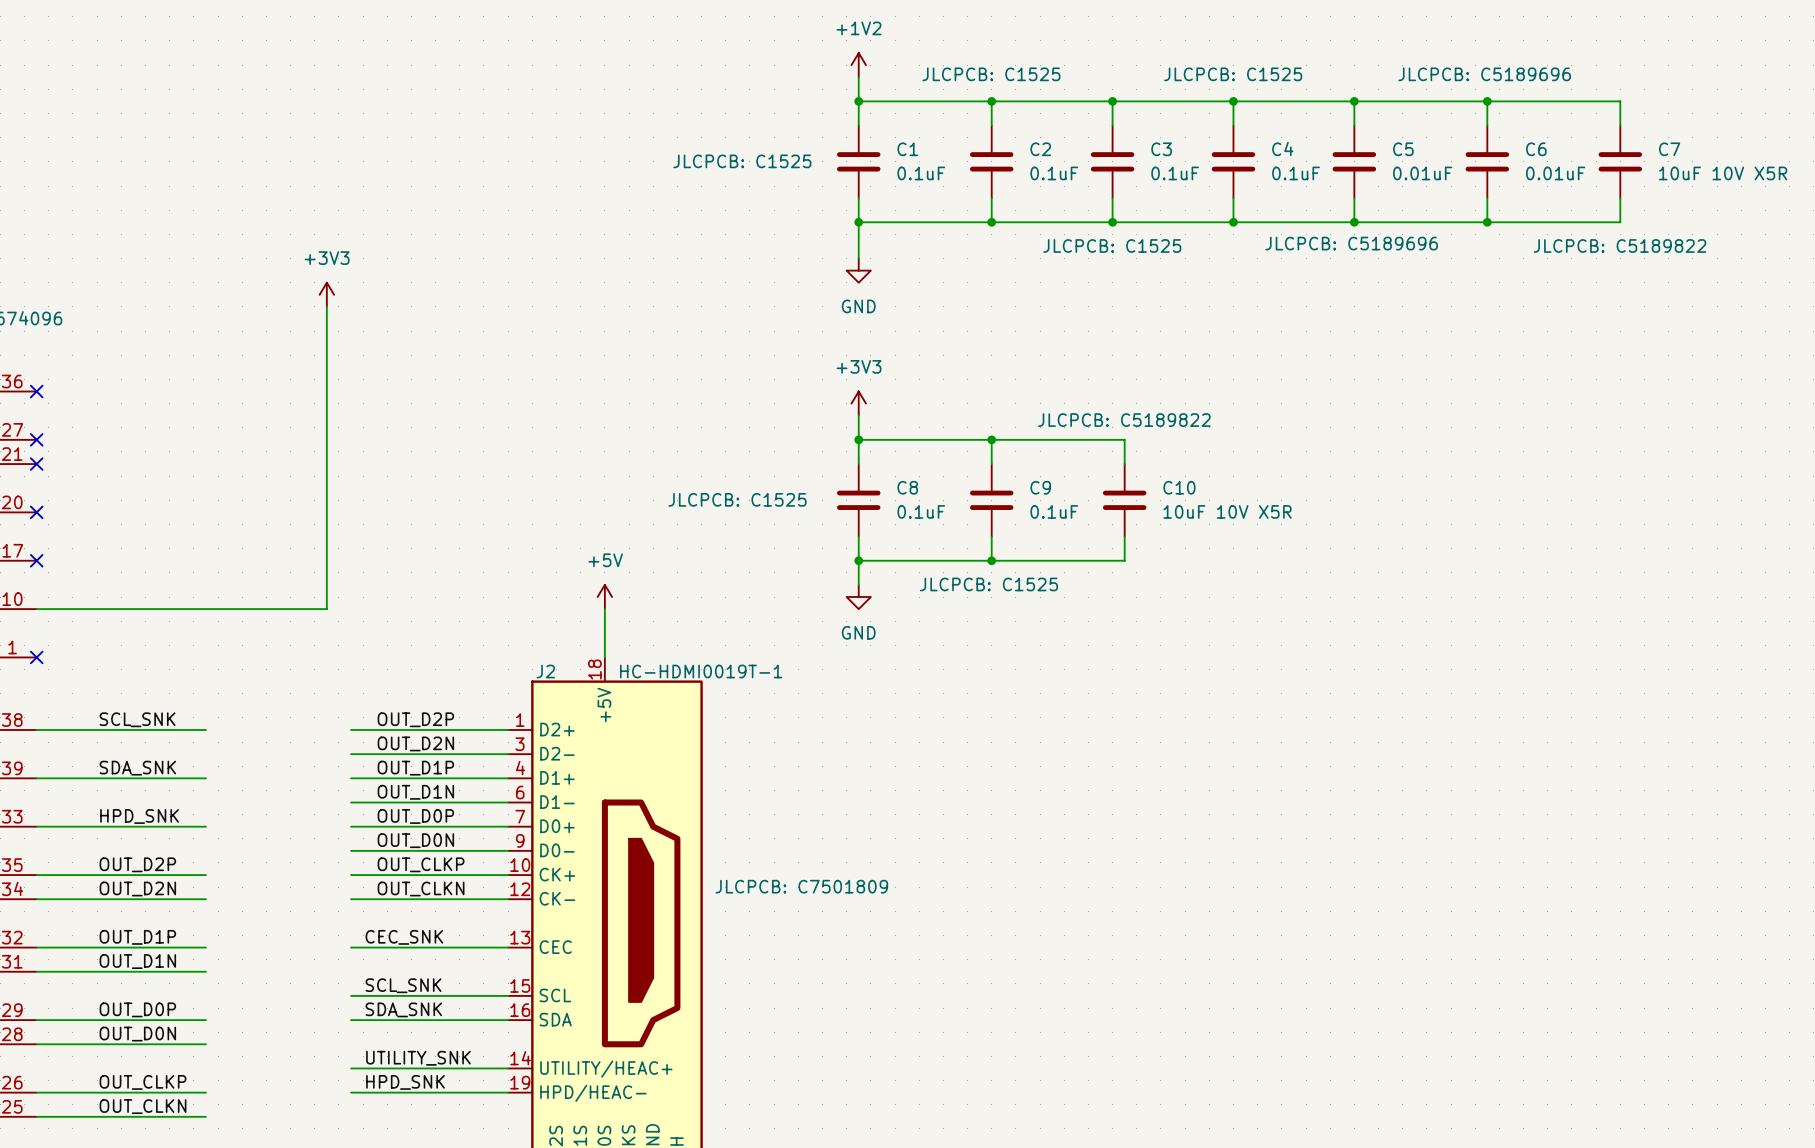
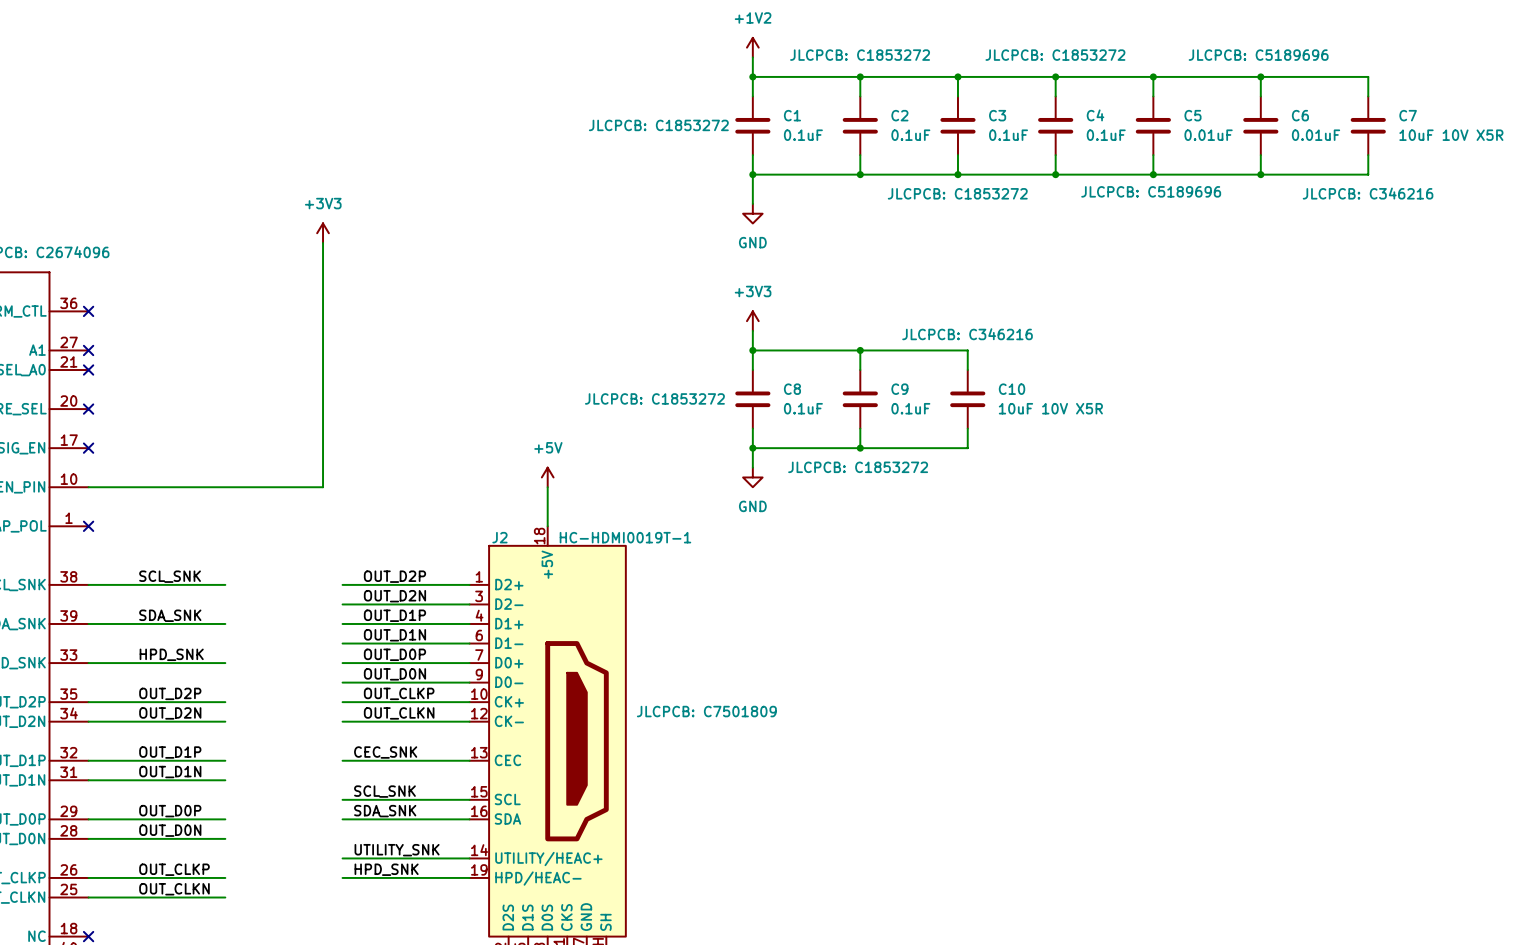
C2 text: JLCPCB: C1525 (991, 74) -> JLCPCB: C1853272 (860, 55)
C4 text: JLCPCB: C1525 (1233, 74) -> JLCPCB: C1853272 (1055, 55)
C1 text: JLCPCB: C1525 (742, 161) -> JLCPCB: C1853272 (658, 125)
C3 text: JLCPCB: C1525 (1112, 245) -> JLCPCB: C1853272 (957, 193)
C7 text: JLCPCB: C5189822 (1620, 245) -> JLCPCB: C346216 (1368, 193)
C10 text: JLCPCB: C5189822 (1124, 420) -> JLCPCB: C346216 (967, 334)
C8 text: JLCPCB: C1525 (737, 499) -> JLCPCB: C1853272 (654, 398)
C9 text: JLCPCB: C1525 (989, 584) -> JLCPCB: C1853272 (858, 467)

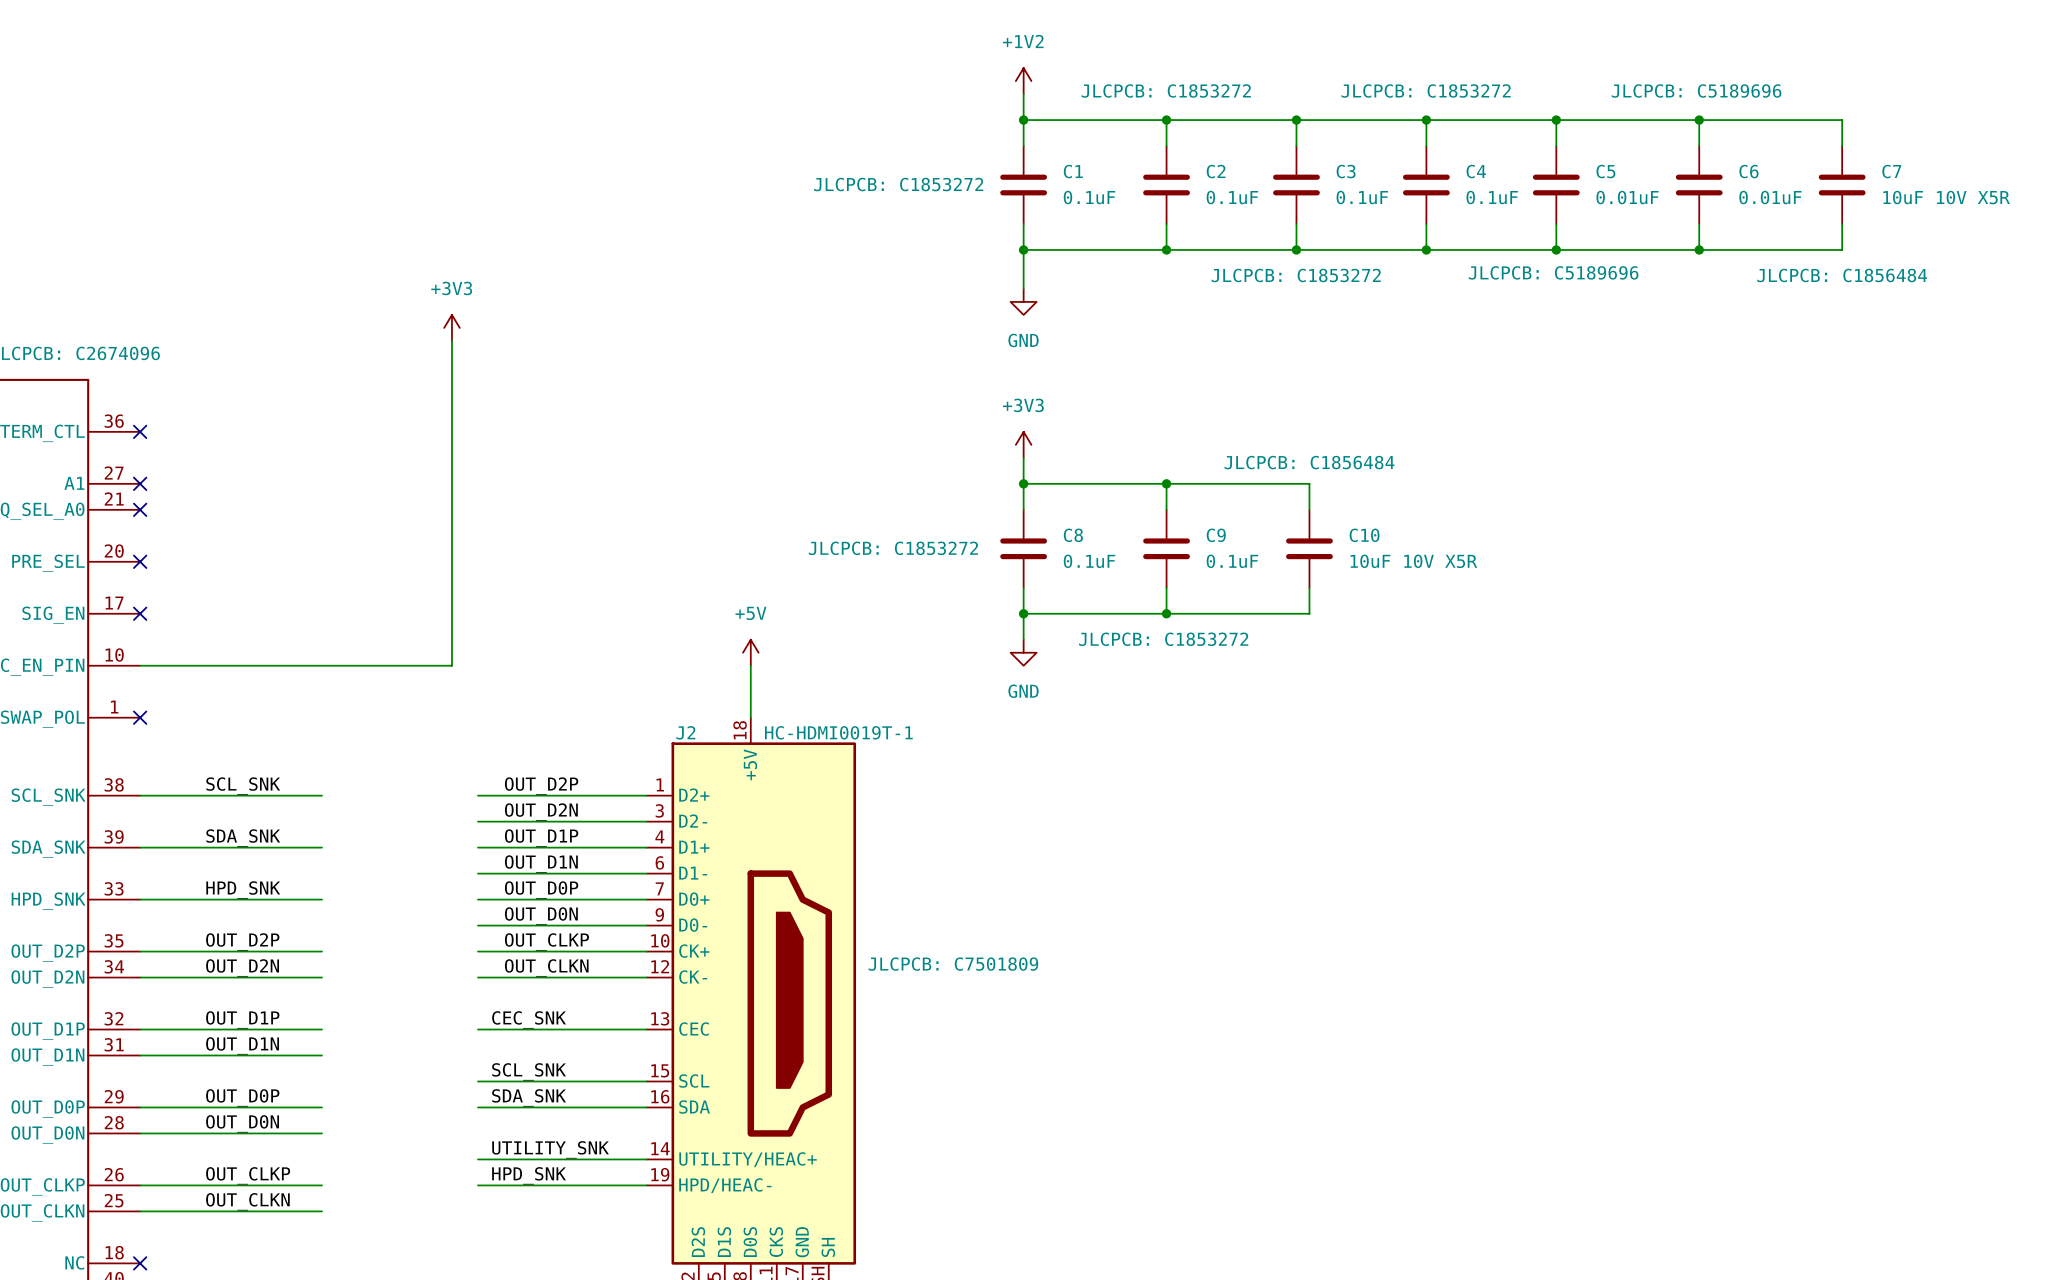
C7 text: JLCPCB: C346216 (1368, 193) -> JLCPCB: C1856484 (1842, 275)
C10 text: JLCPCB: C346216 (967, 334) -> JLCPCB: C1856484 (1309, 462)

